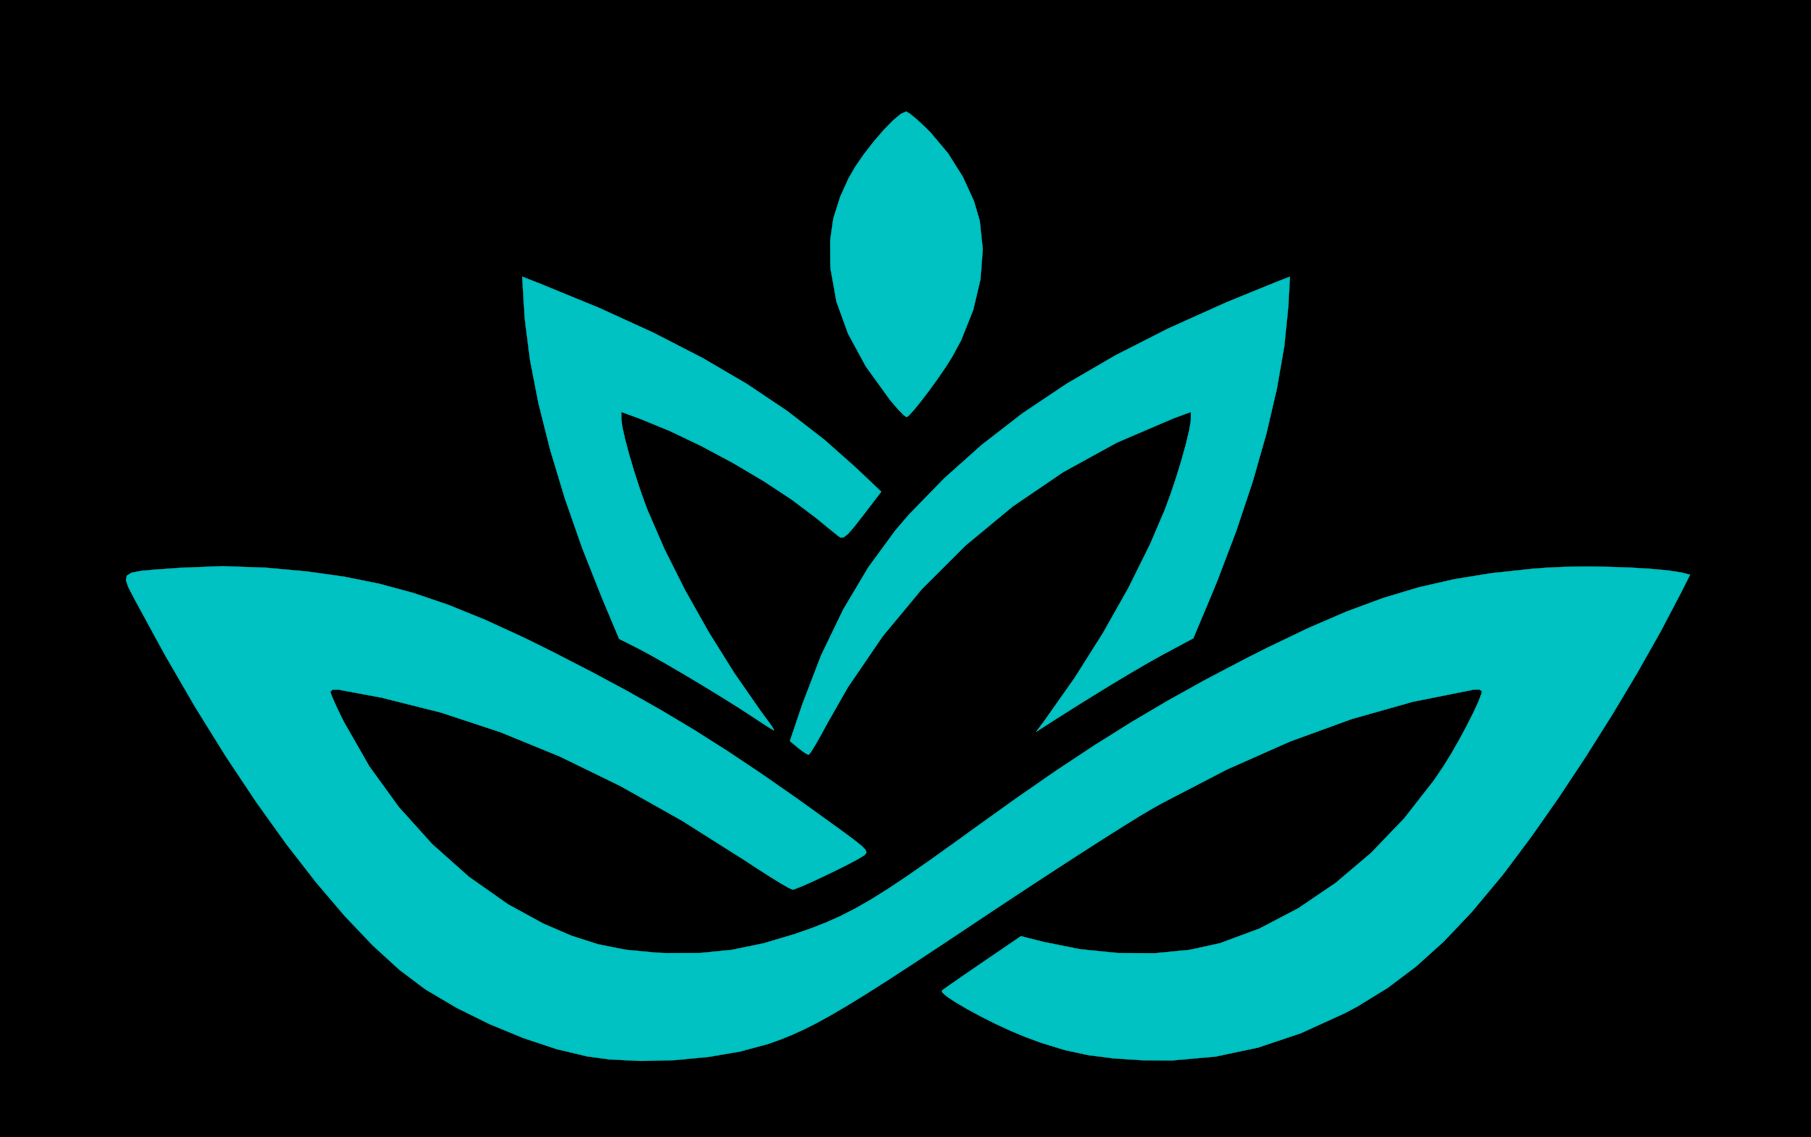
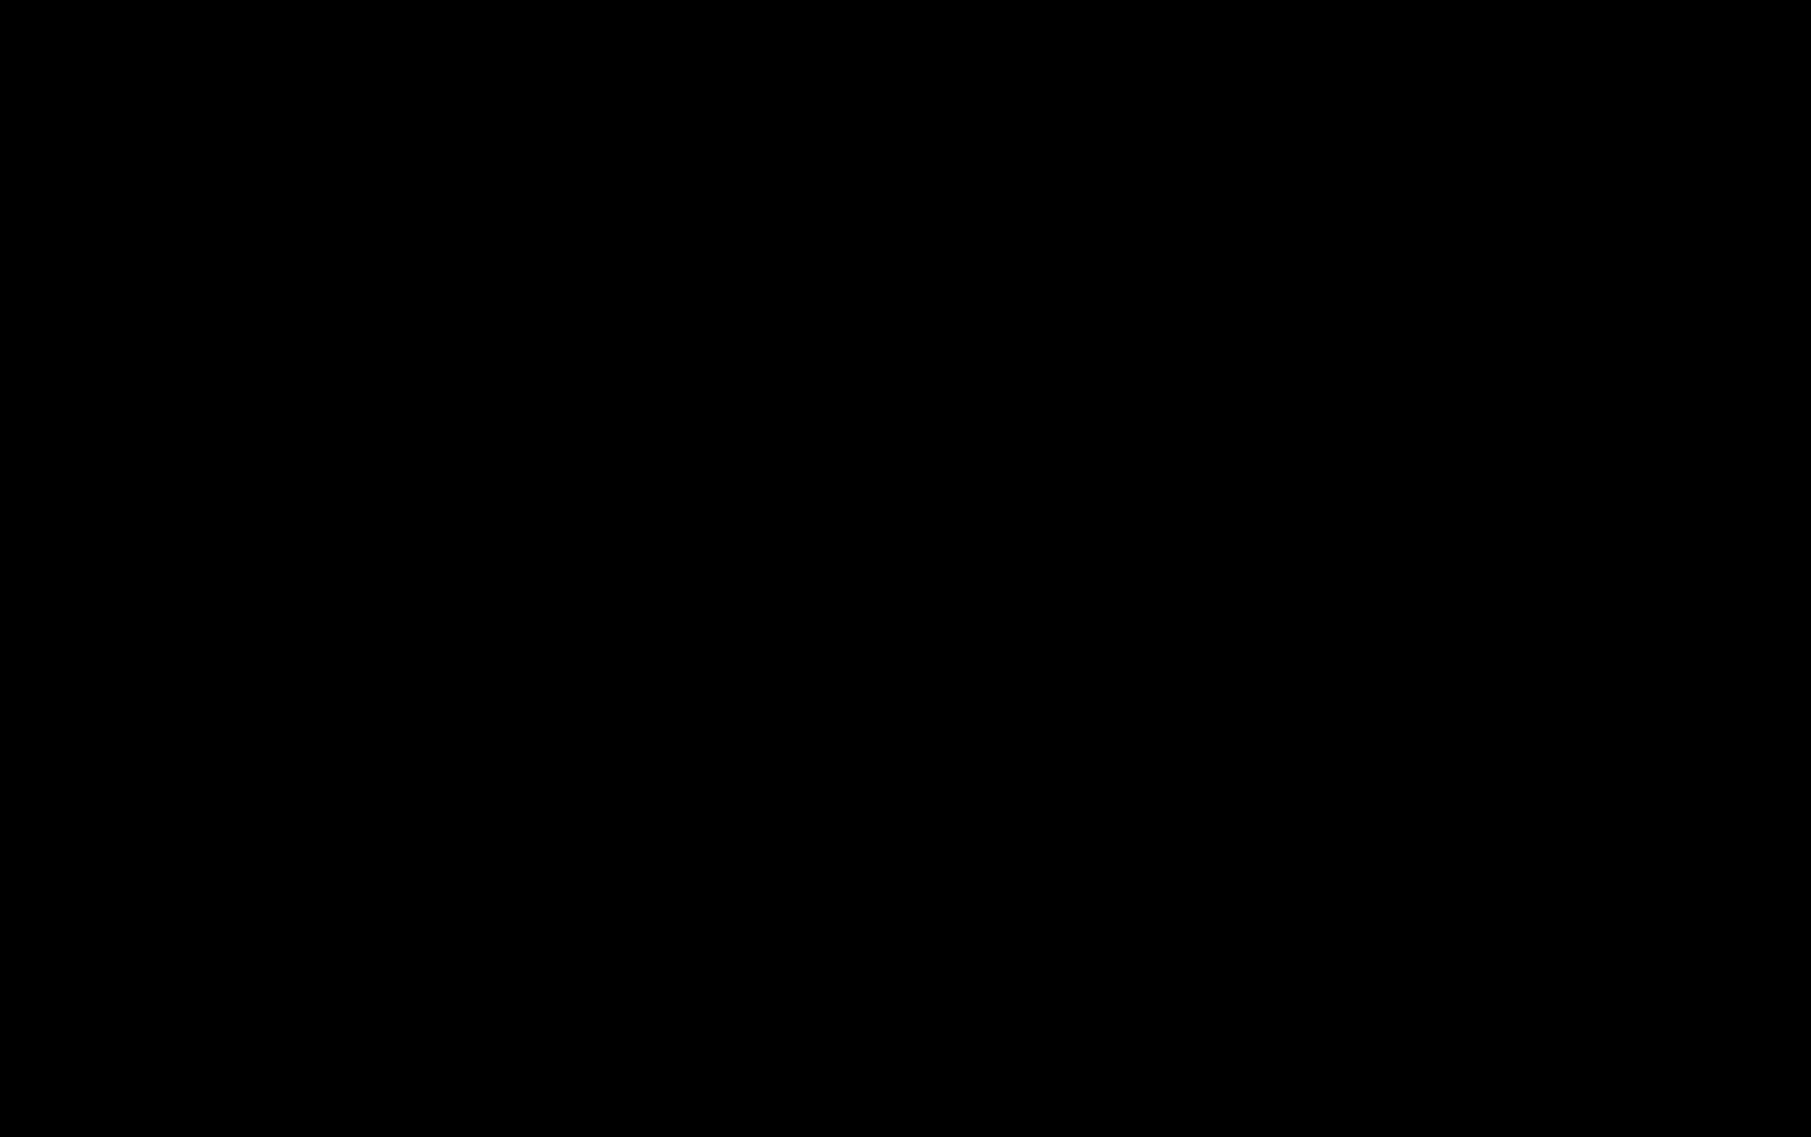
drawing: [125, 111, 1691, 1062] -> none

